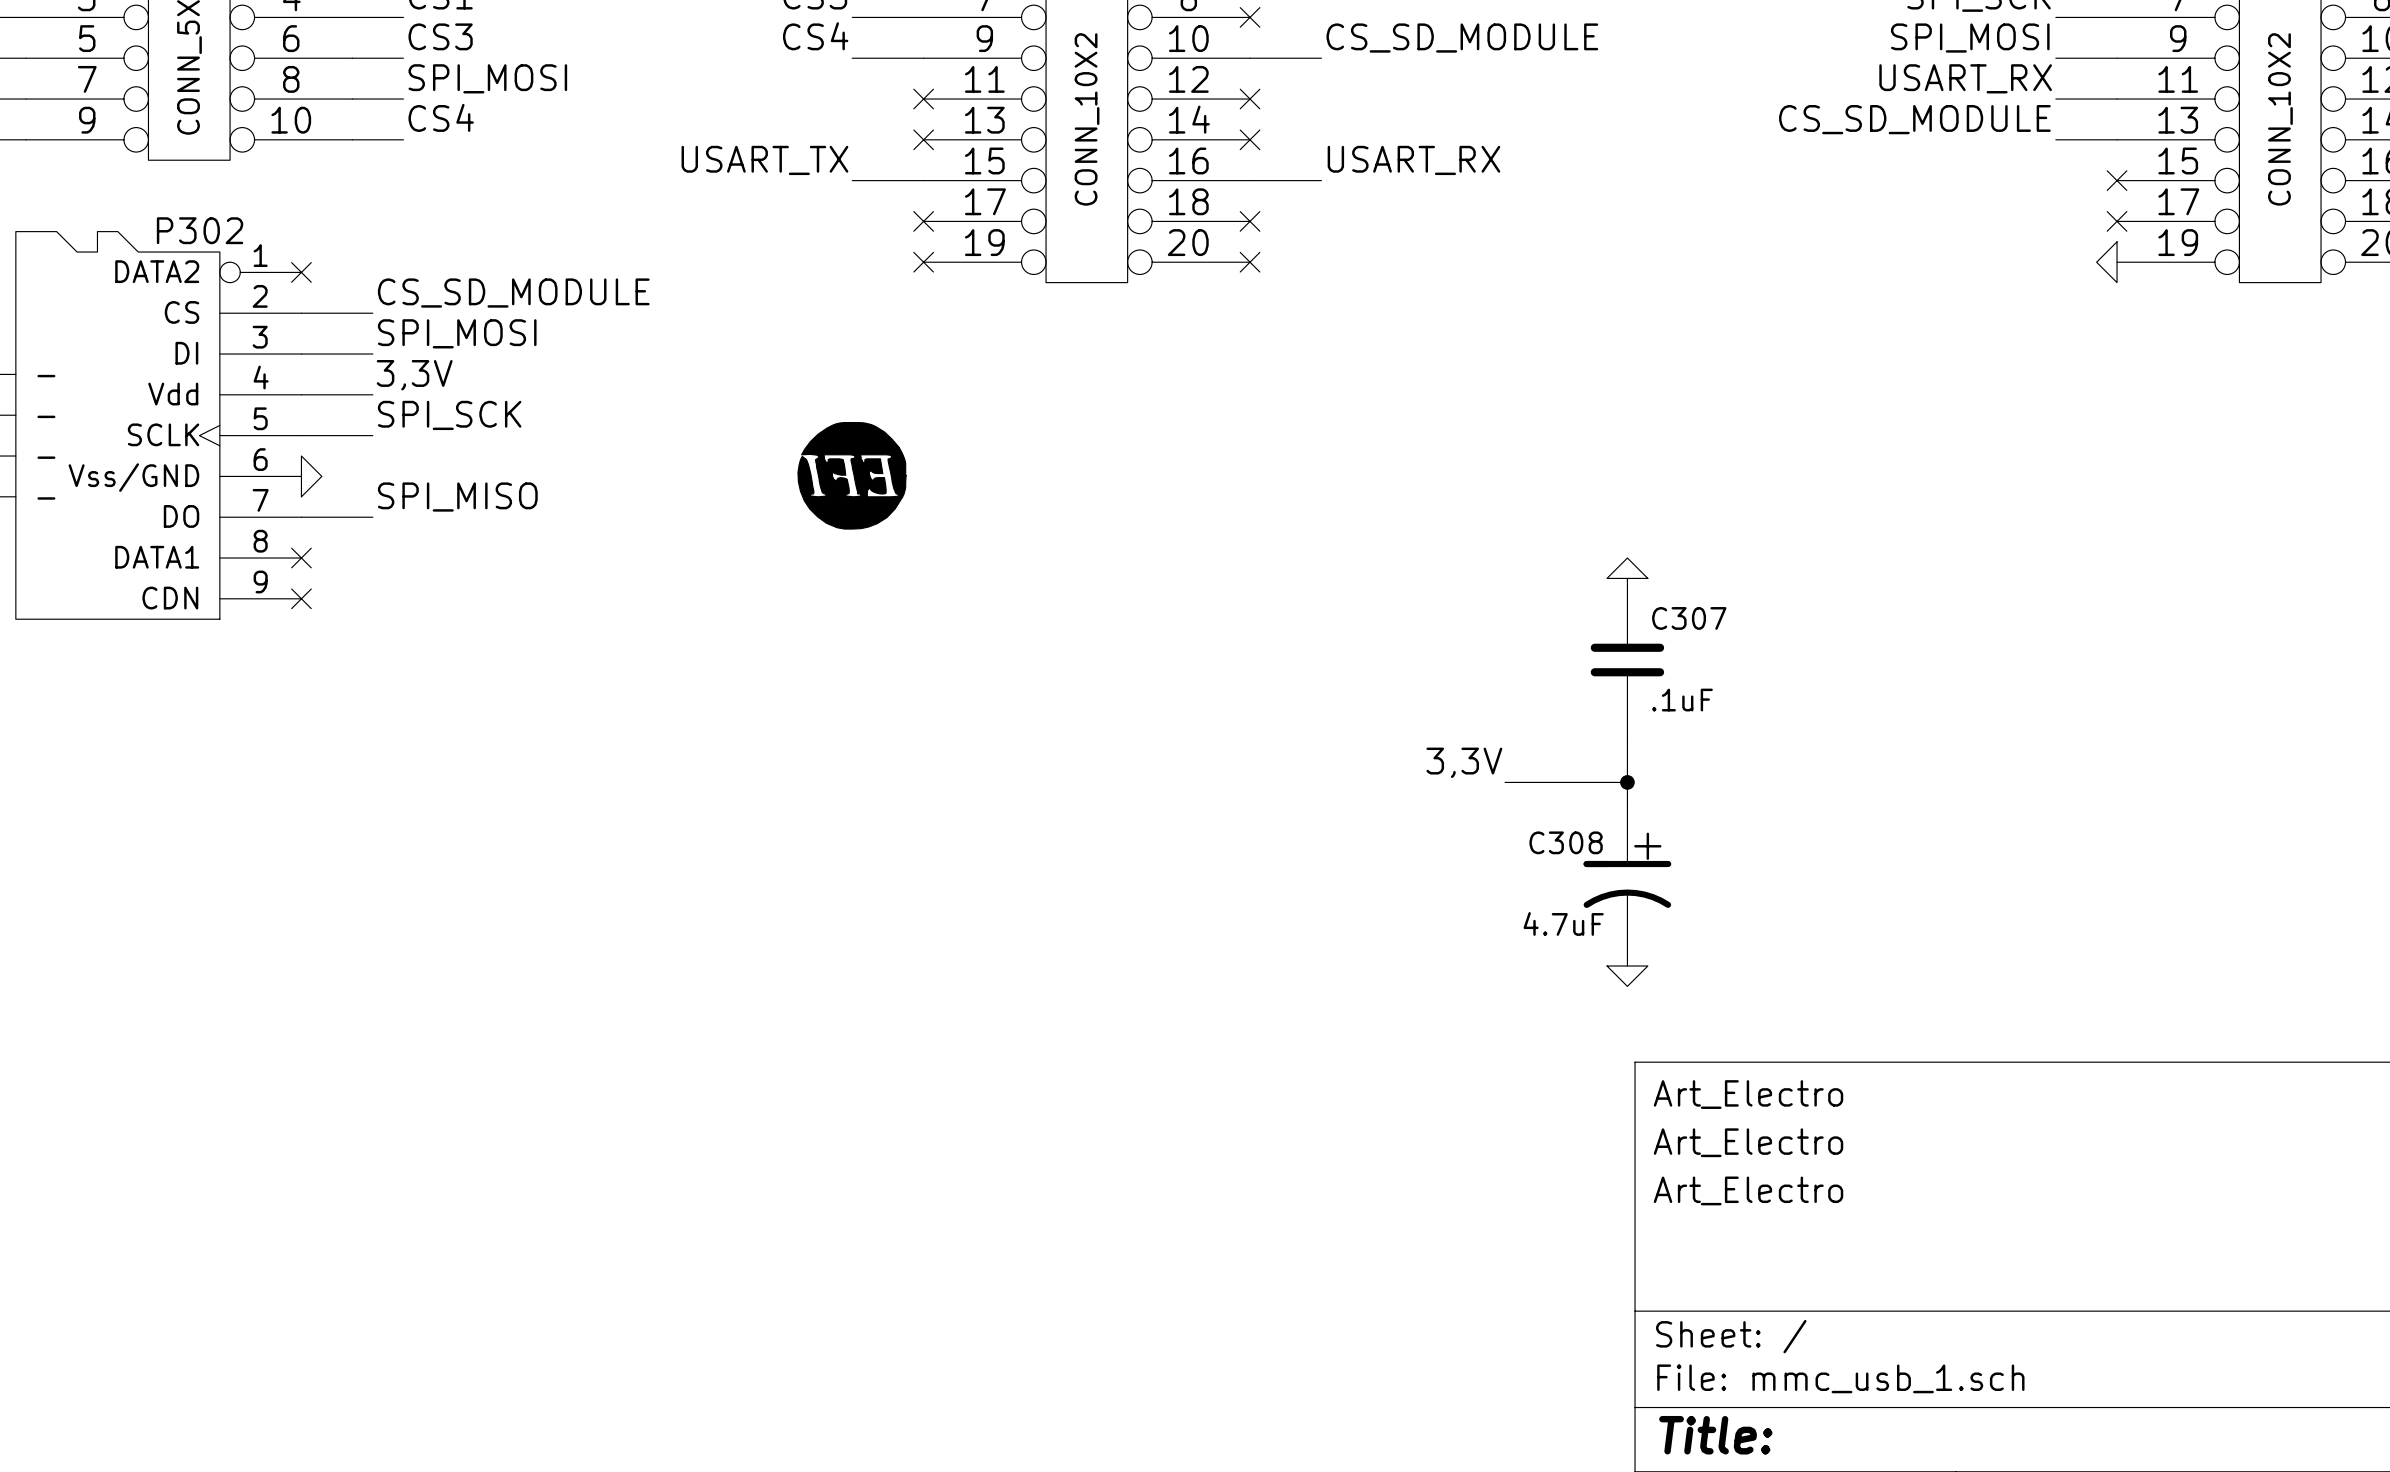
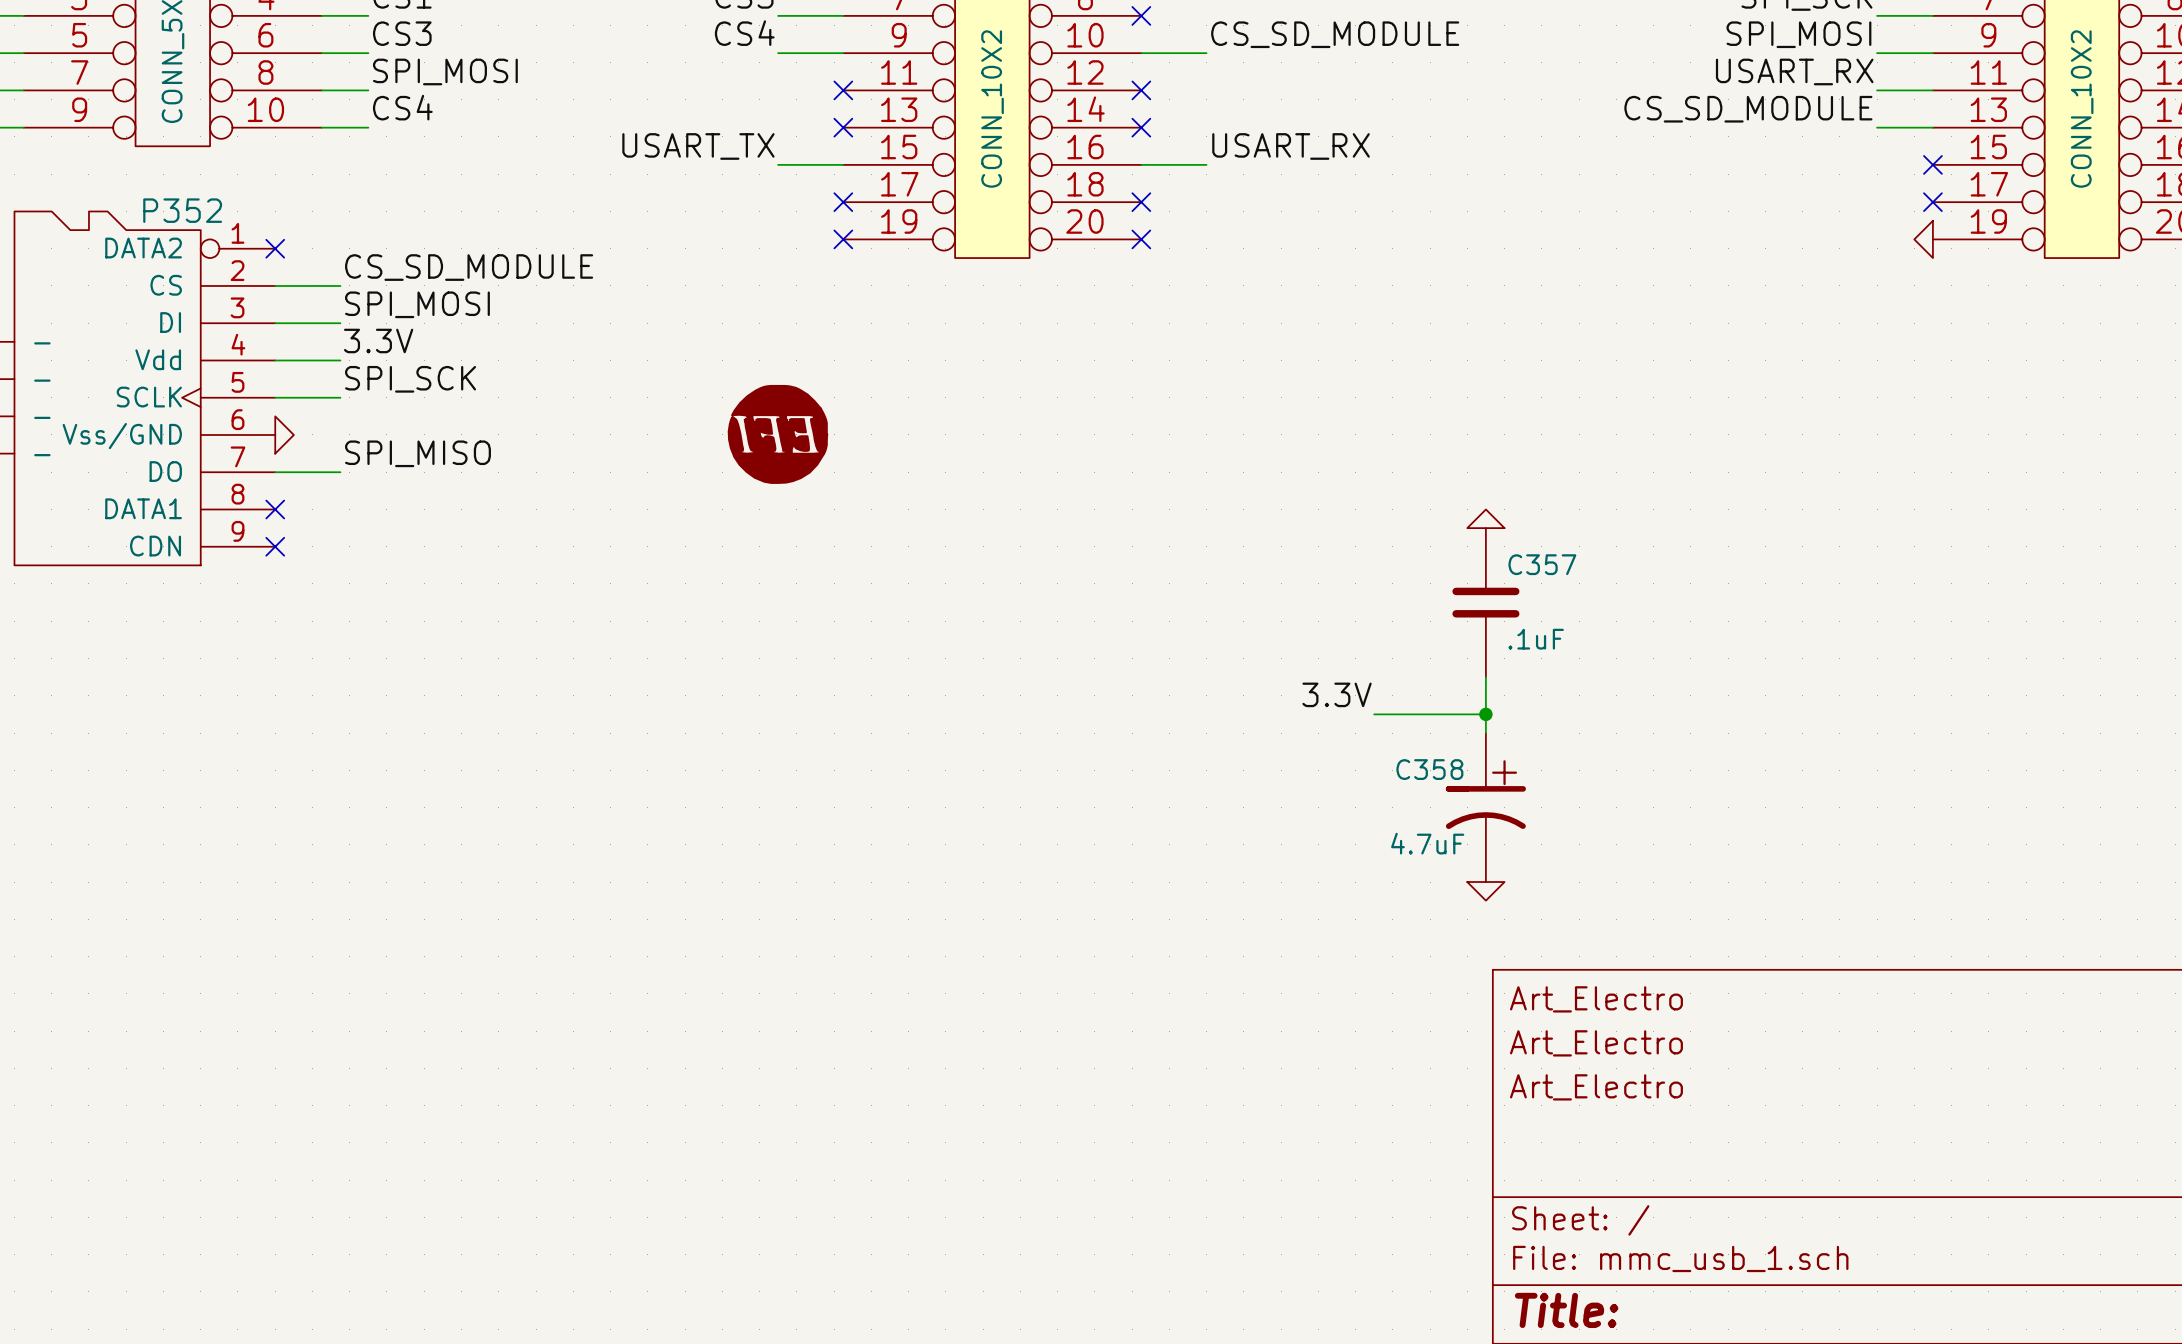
P302 name: P302 (200, 230) -> P352 (182, 210)
label: 3,3V (414, 375) -> 3.3V (378, 340)
C307 name: C307 (1689, 618) -> C357 (1542, 564)
label: 3,3V (1464, 762) -> 3.3V (1337, 694)
C308 name: C308 (1566, 842) -> C358 (1429, 769)

